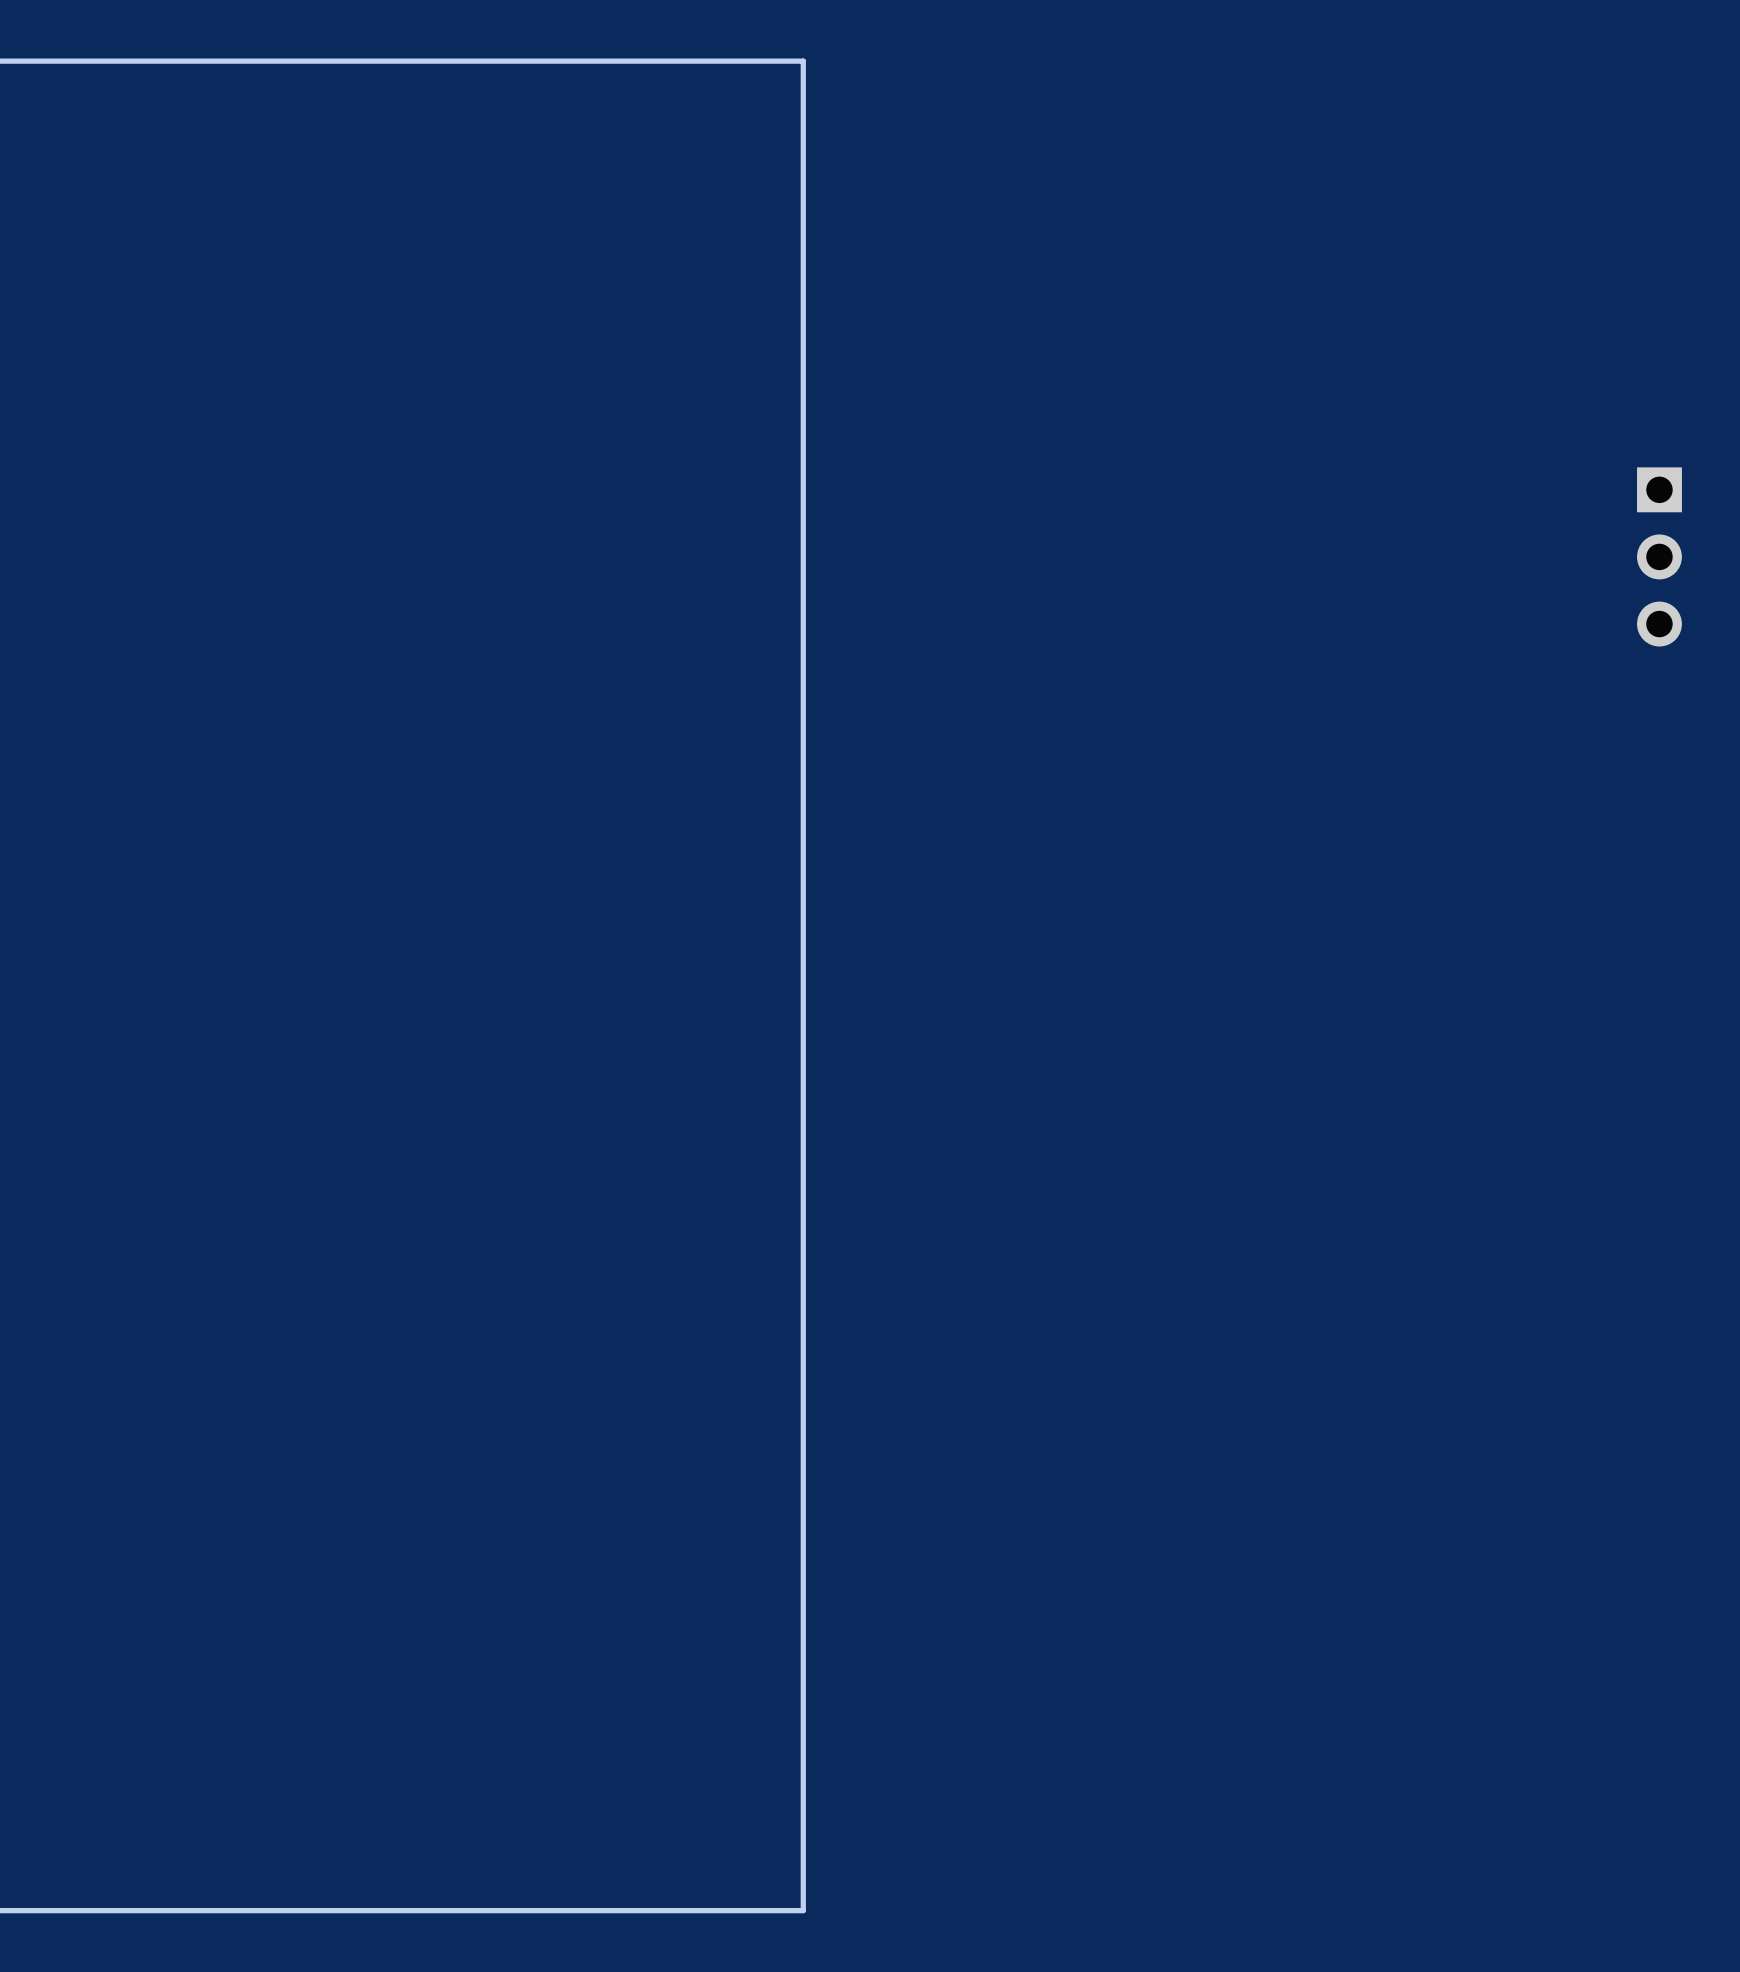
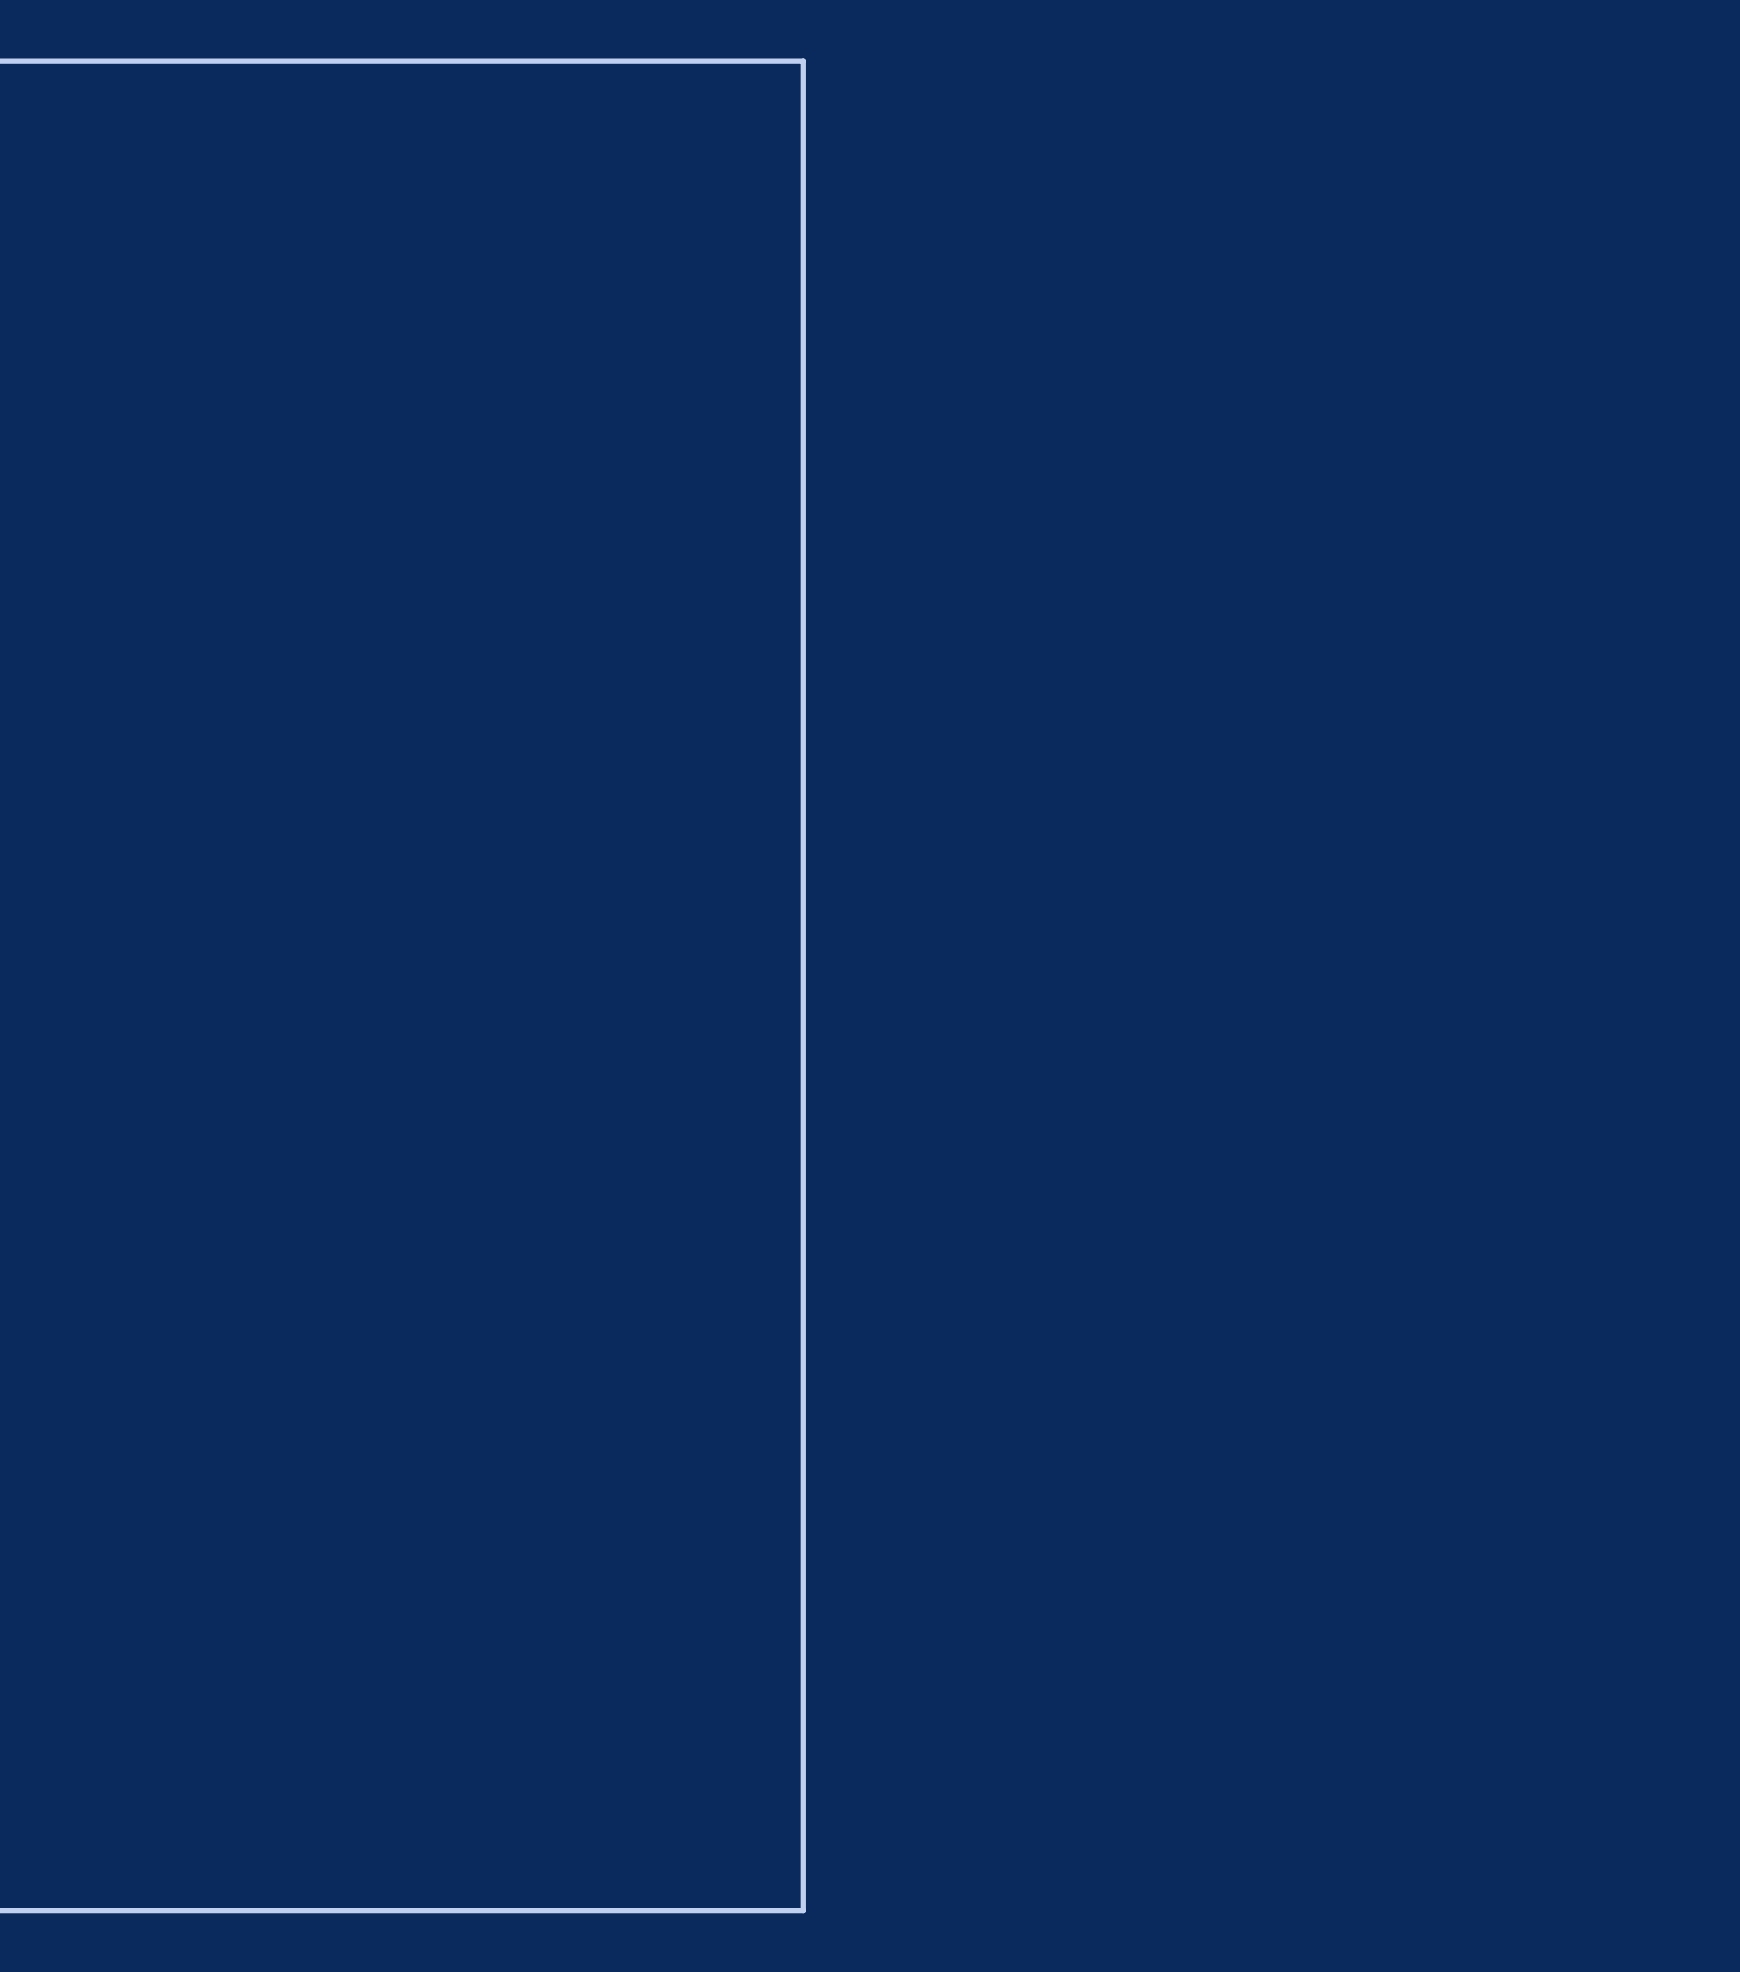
part: (1659, 556) -> none

